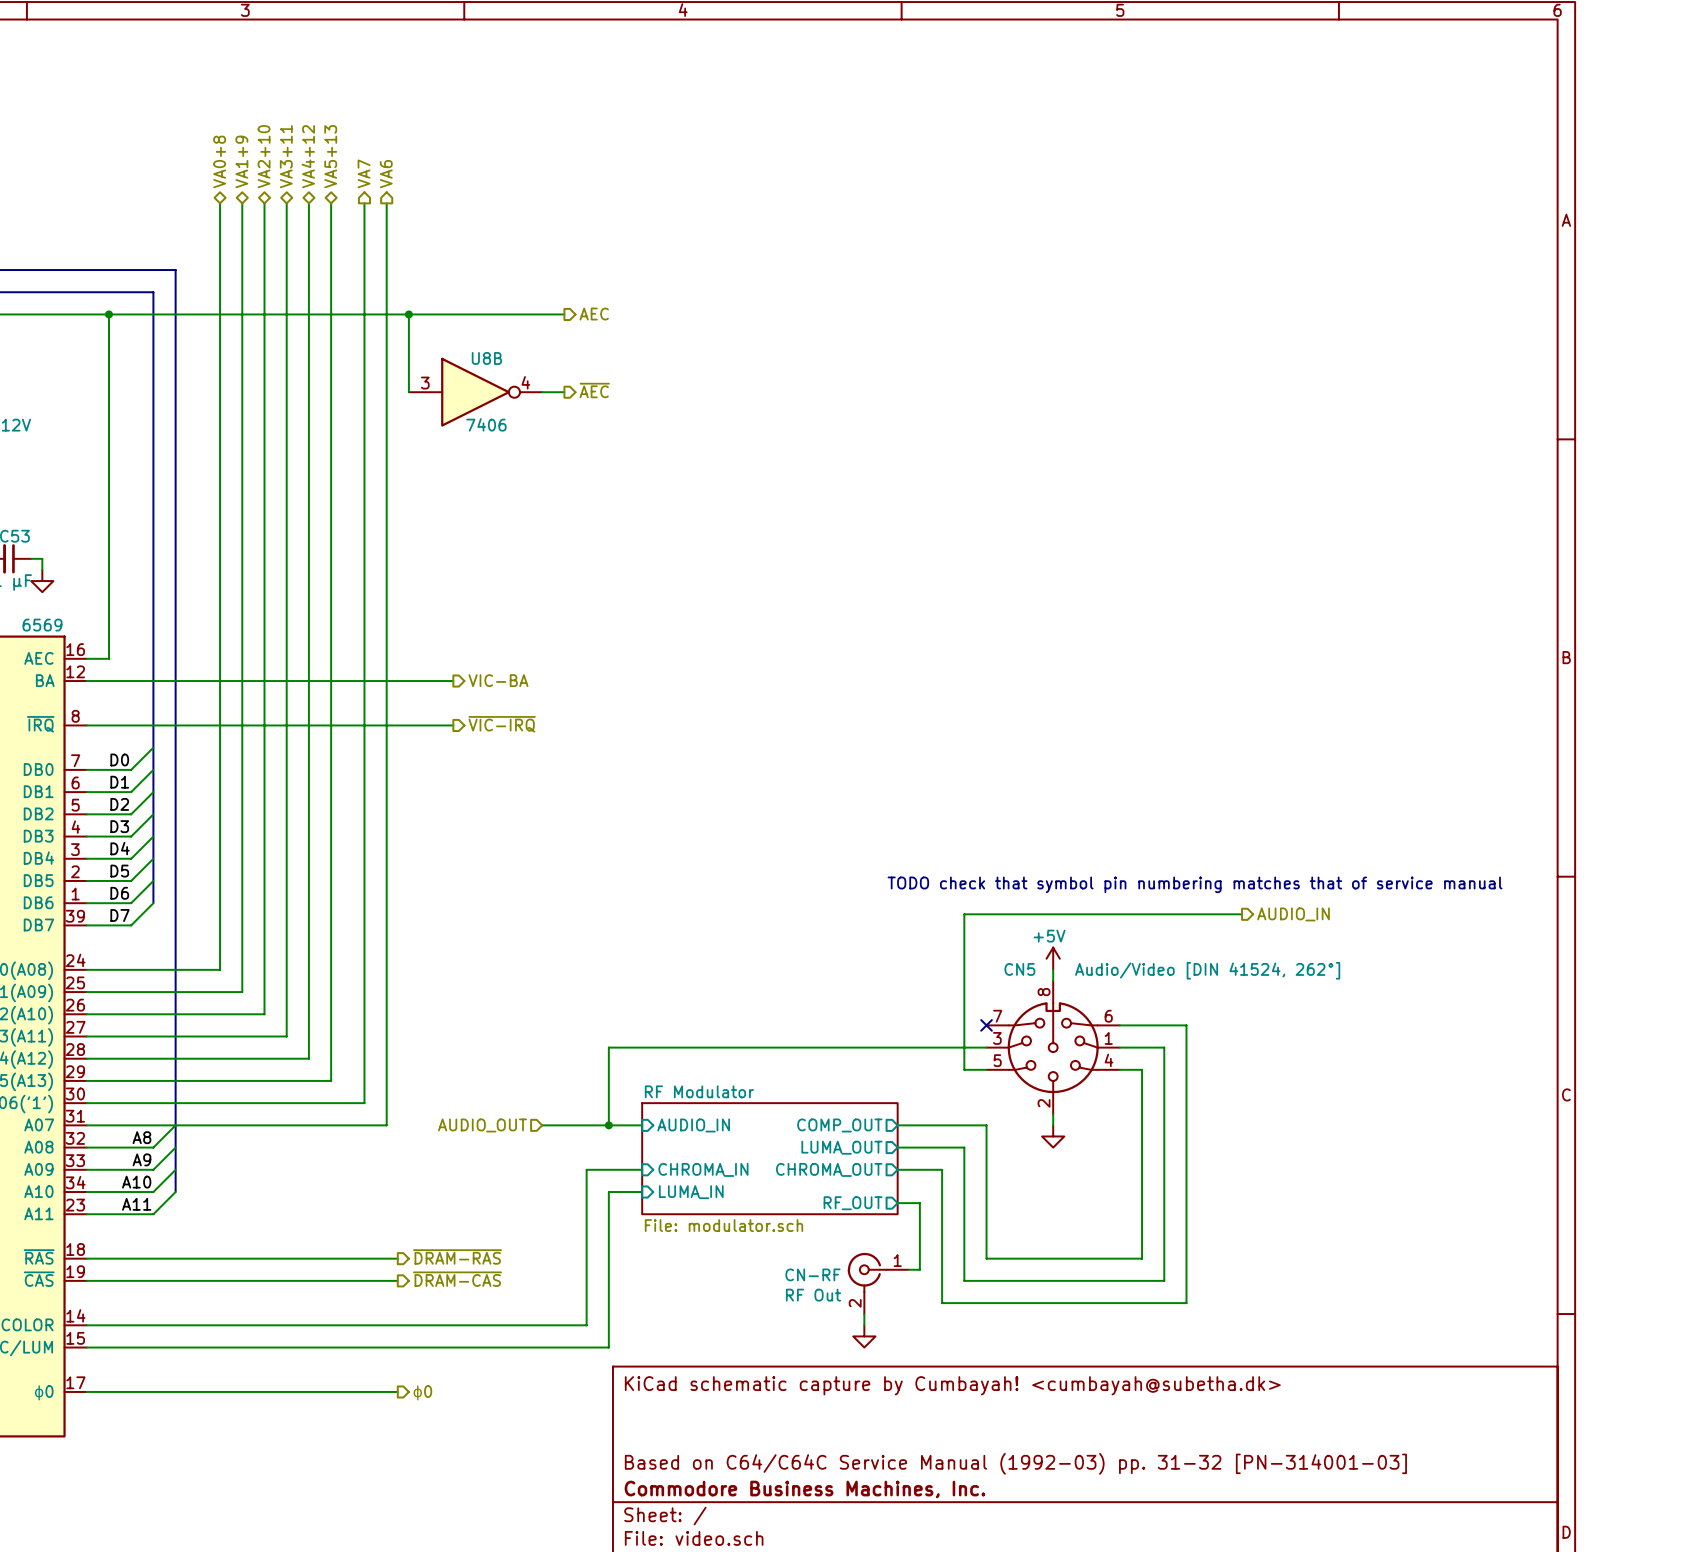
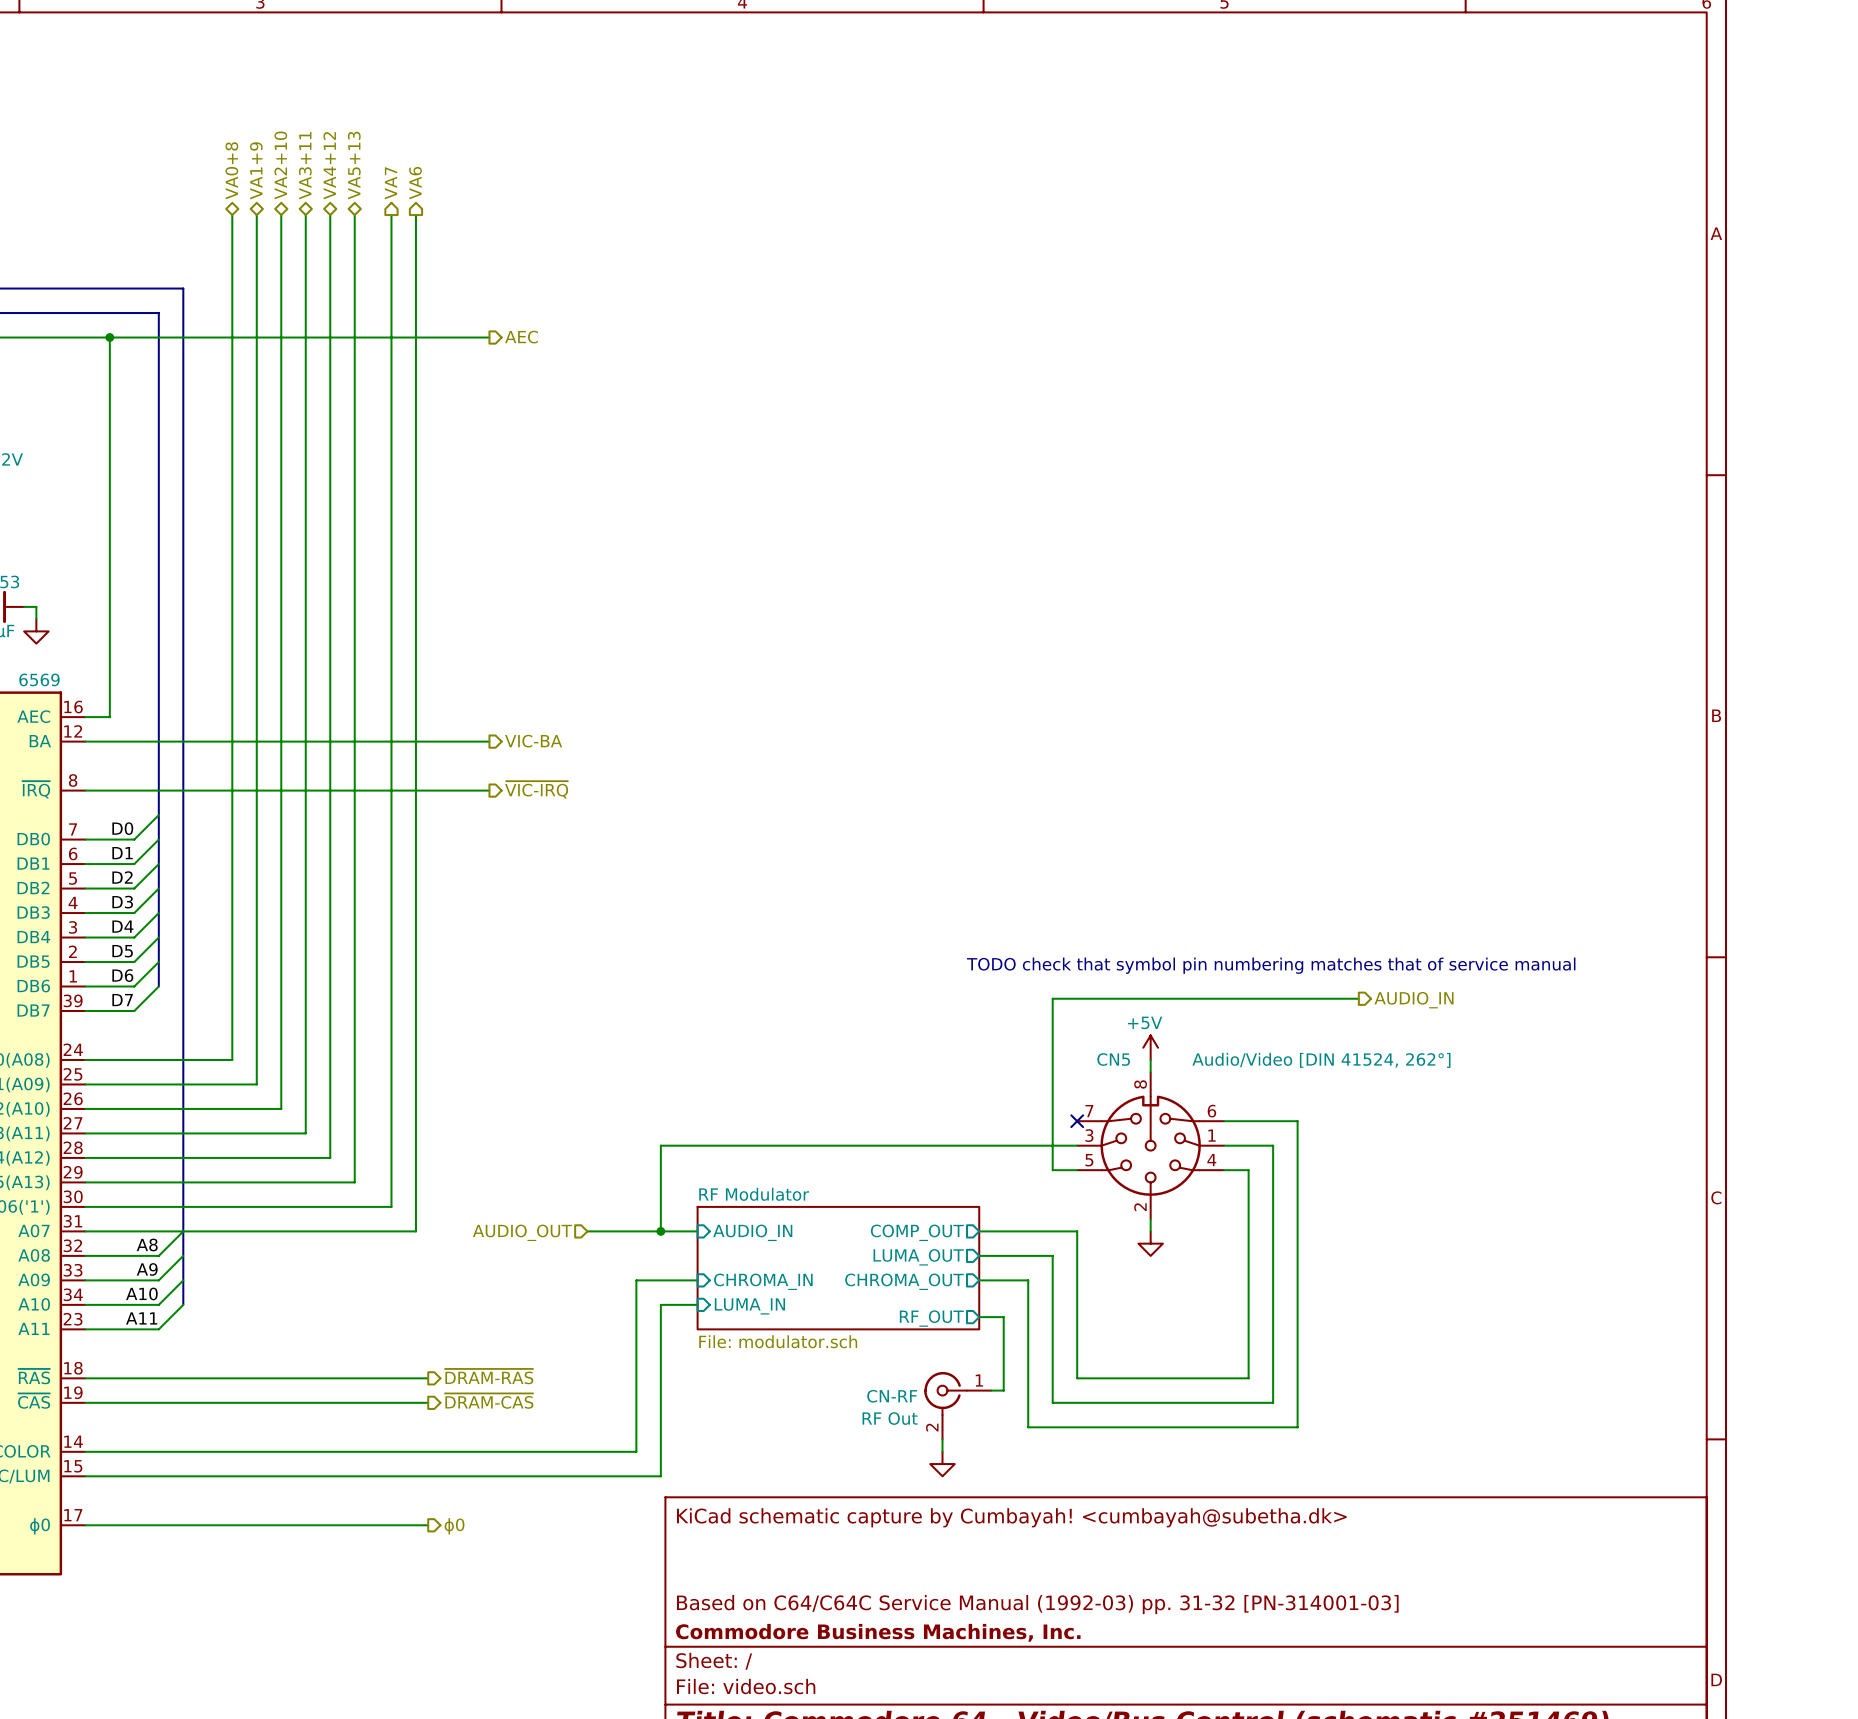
wire: (408, 314) (408, 392) -> none
junction: (408, 314) -> none
wire: (453, 314) (564, 314) -> none
hierarchical label position: AEC (594, 314) -> AEC (521, 337)
hierarchical label: ~{AEC} (594, 390) -> none
U8B: 7406 (475, 392) -> none
wire: (542, 392) (564, 392) -> none

